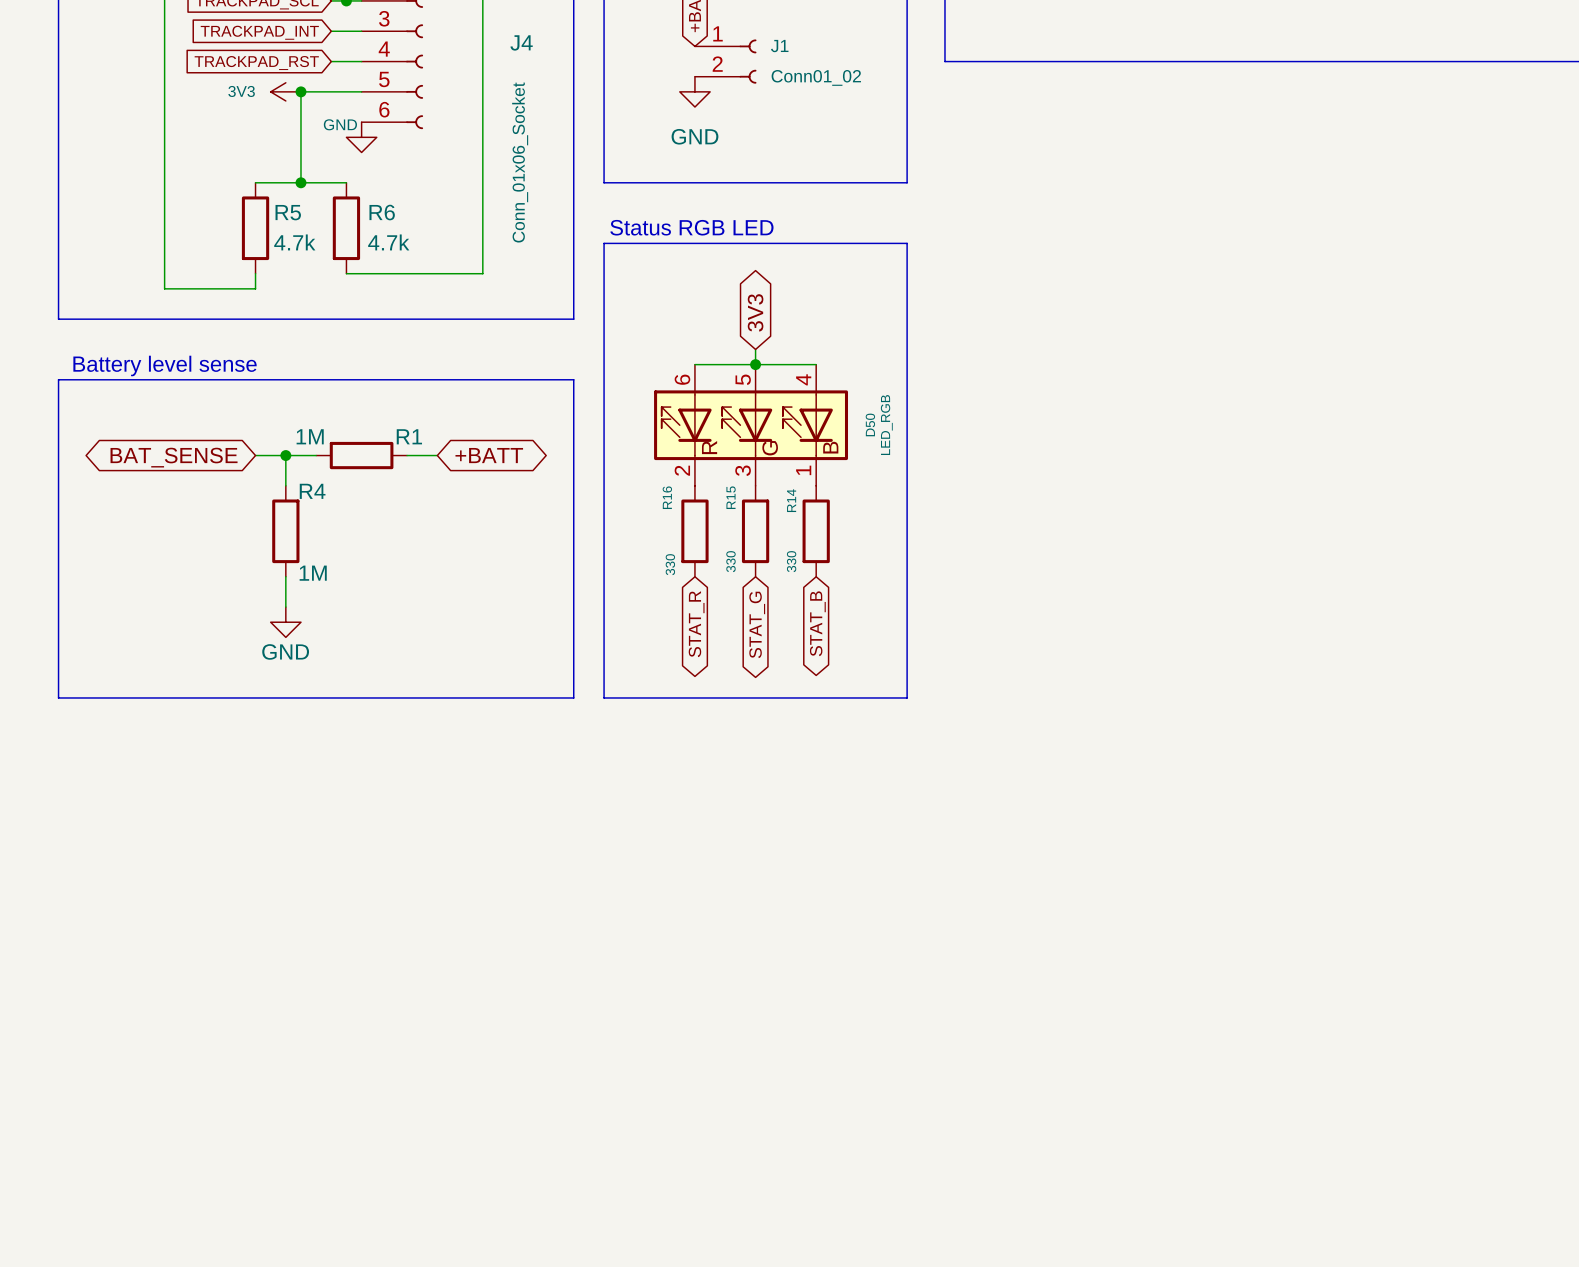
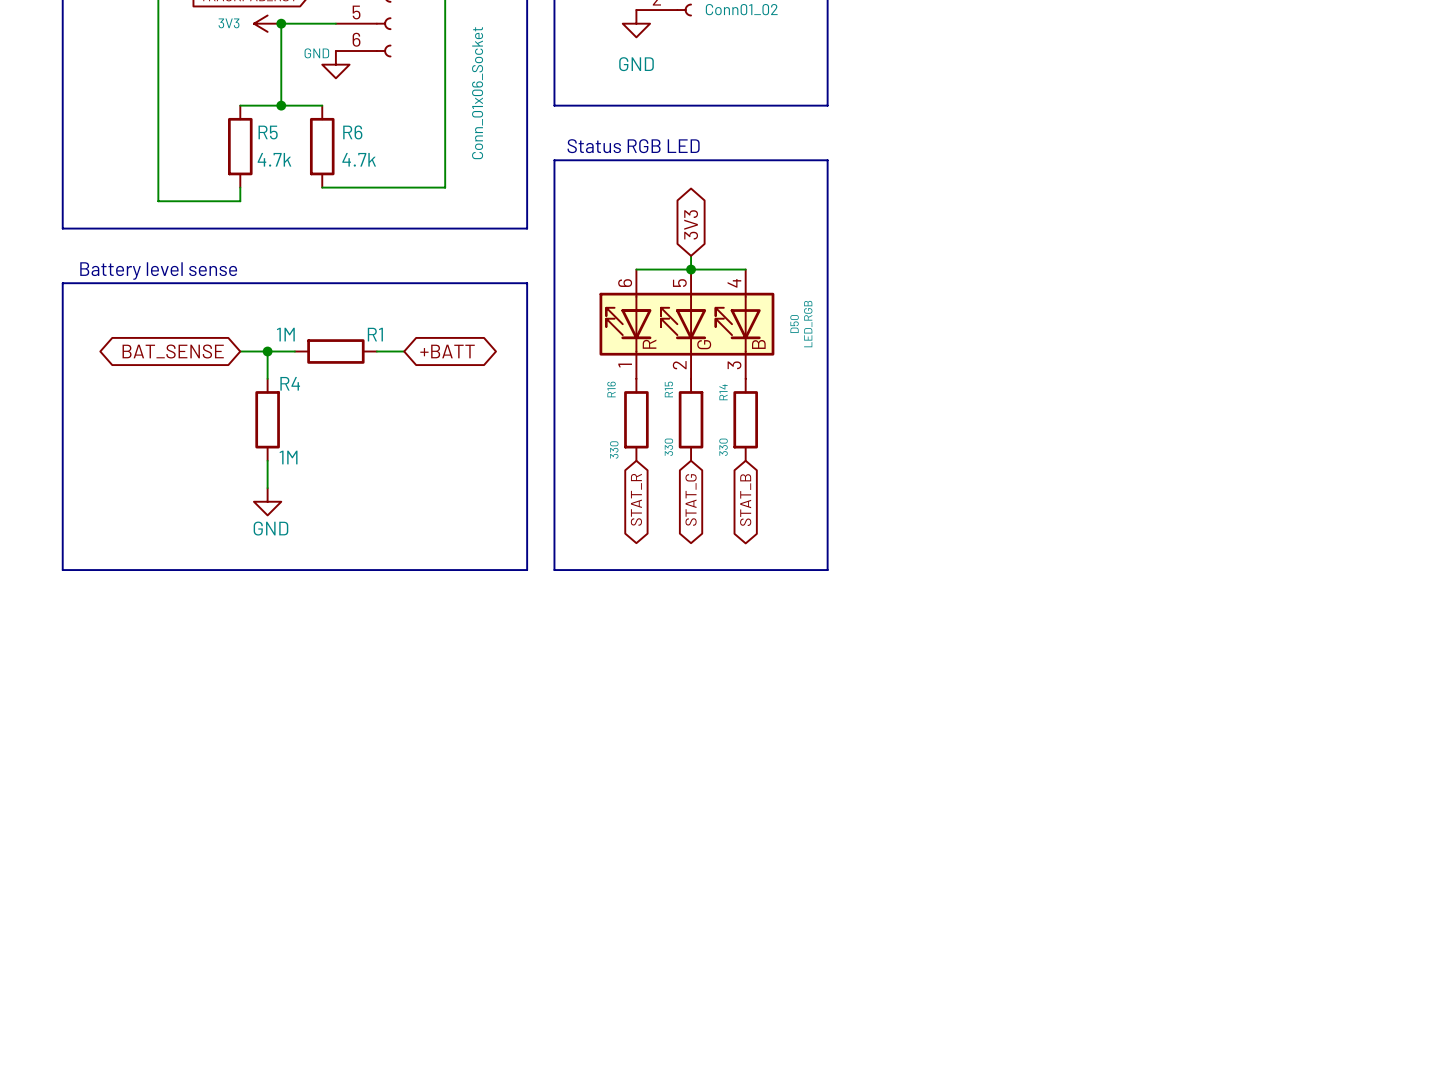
D50 pin number: 2 (682, 470) -> 1 (625, 365)
D50 pin number: 3 (743, 470) -> 2 (679, 365)
D50 pin number: 1 (803, 470) -> 3 (734, 365)

